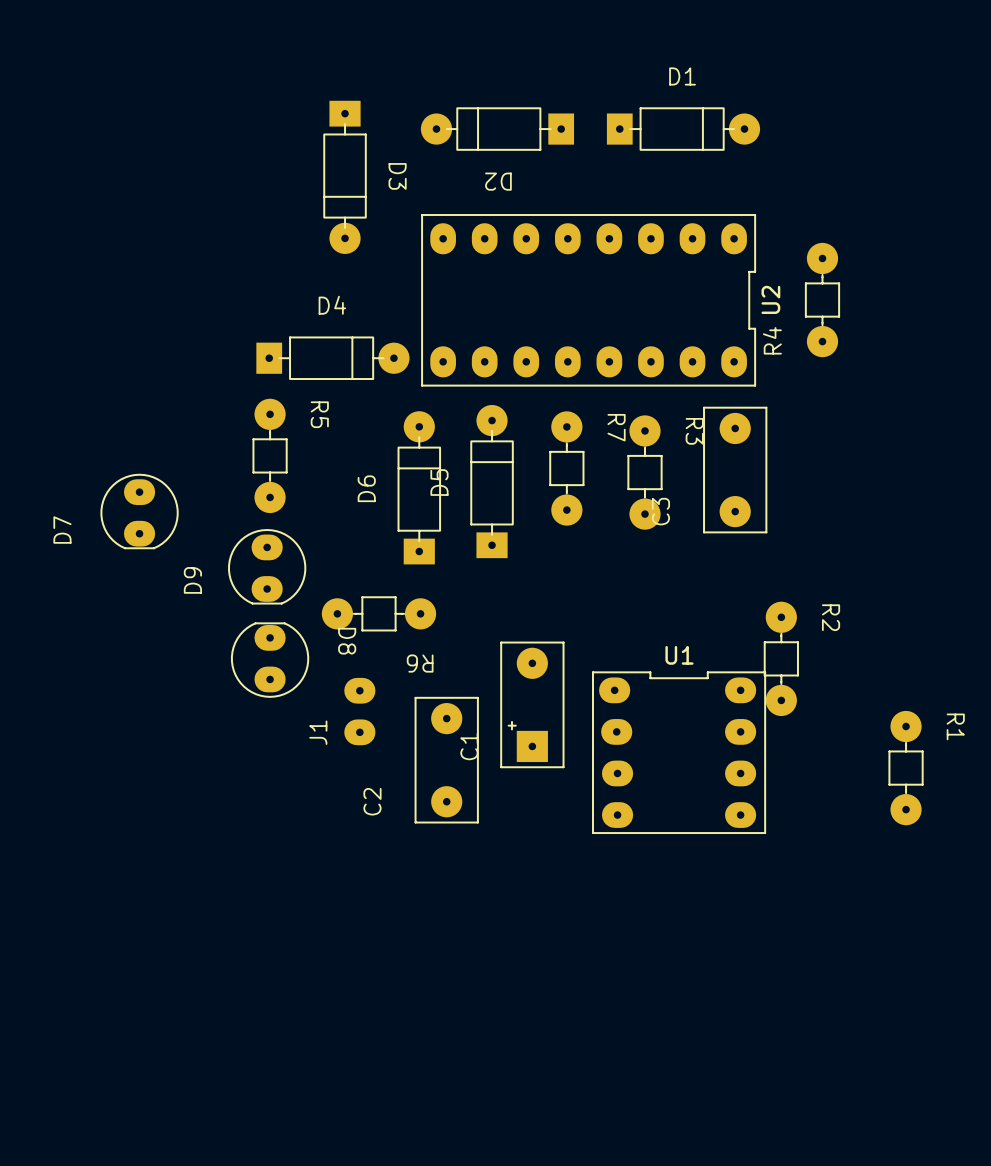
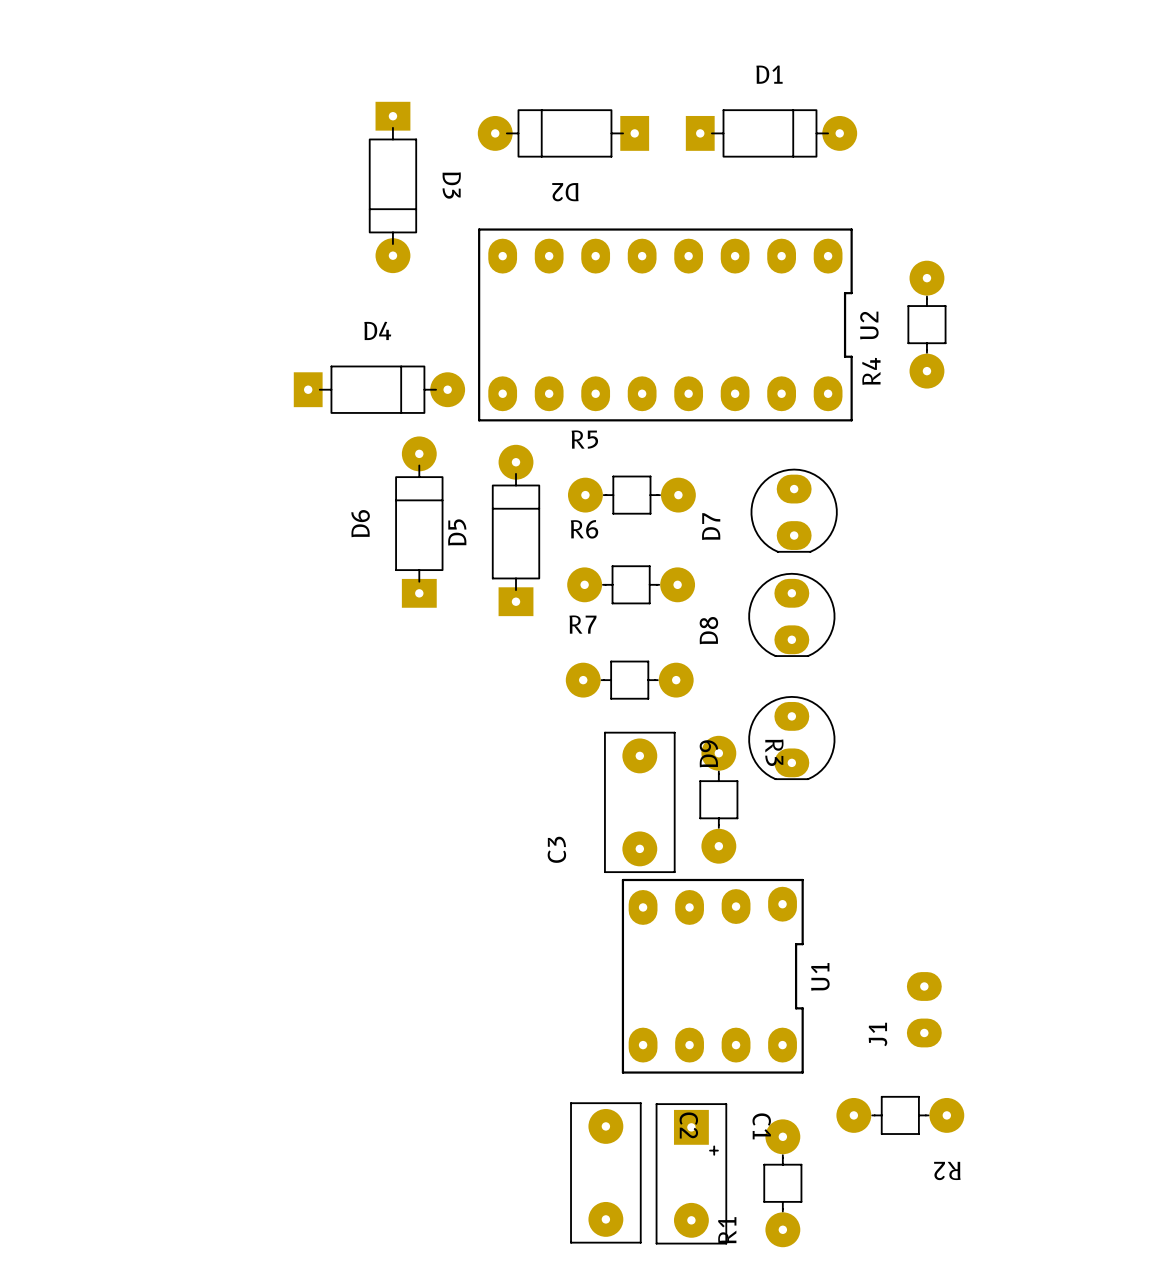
R5 name position: R5 (319, 414) -> R5 (584, 439)
R7 name position: R7 (616, 427) -> R7 (582, 624)
R5 rotation: 0° (270, 455) -> 90° clockwise (631, 495)
R5 position: (270, 455) -> (631, 495)
R7 rotation: 0° (566, 468) -> 90° clockwise (629, 680)
R7 position: (566, 468) -> (629, 680)
C3 position: (735, 470) -> (639, 802)
R3 position: (645, 472) -> (718, 799)
D5 position: (492, 481) -> (516, 530)
D6 position: (419, 487) -> (419, 522)
D7 position: (139, 511) -> (794, 510)
D7 name position: D7 (62, 530) -> D7 (711, 526)
D9 position: (267, 566) -> (791, 738)
R6 position: (378, 613) -> (631, 584)
R2 rotation: 0° (781, 658) -> 90° clockwise (900, 1115)
R2 position: (781, 658) -> (900, 1115)
D8 rotation: 0° (270, 660) -> 180° (791, 614)
D8 position: (270, 660) -> (791, 614)
R6 name rotation: 0° (420, 663) -> 180° (584, 529)
R6 name position: R6 (420, 663) -> R6 (584, 529)
C1 rotation: 0° (532, 704) -> 180° (691, 1173)
C1 position: (532, 704) -> (691, 1173)
J1 position: (359, 711) -> (924, 1009)
R1 name rotation: 0° (955, 726) -> 180° (727, 1230)
R1 name position: R1 (955, 726) -> R1 (727, 1230)
U1 rotation: 0° (679, 752) -> 90° clockwise (712, 976)
U1 position: (679, 752) -> (712, 976)
C2 position: (446, 760) -> (605, 1172)
R1 position: (906, 768) -> (782, 1183)
C2 name rotation: 0° (372, 801) -> 180° (688, 1125)
C2 name position: C2 (372, 801) -> C2 (688, 1125)

